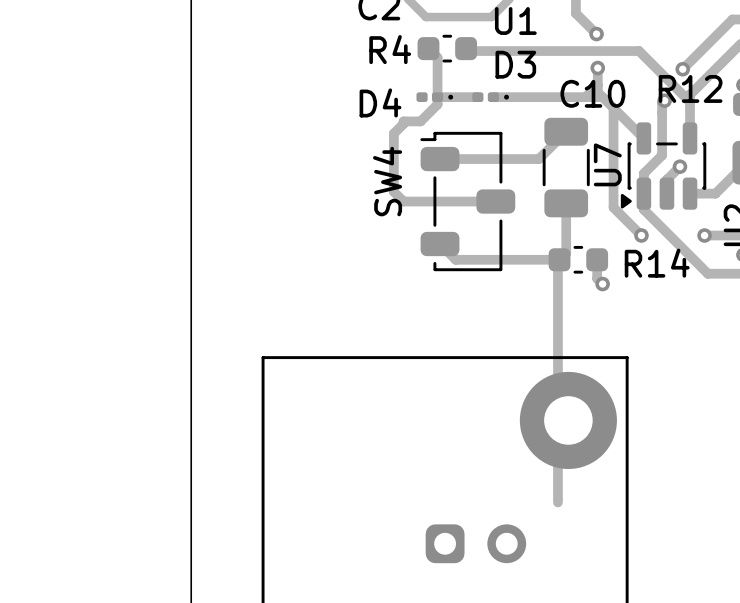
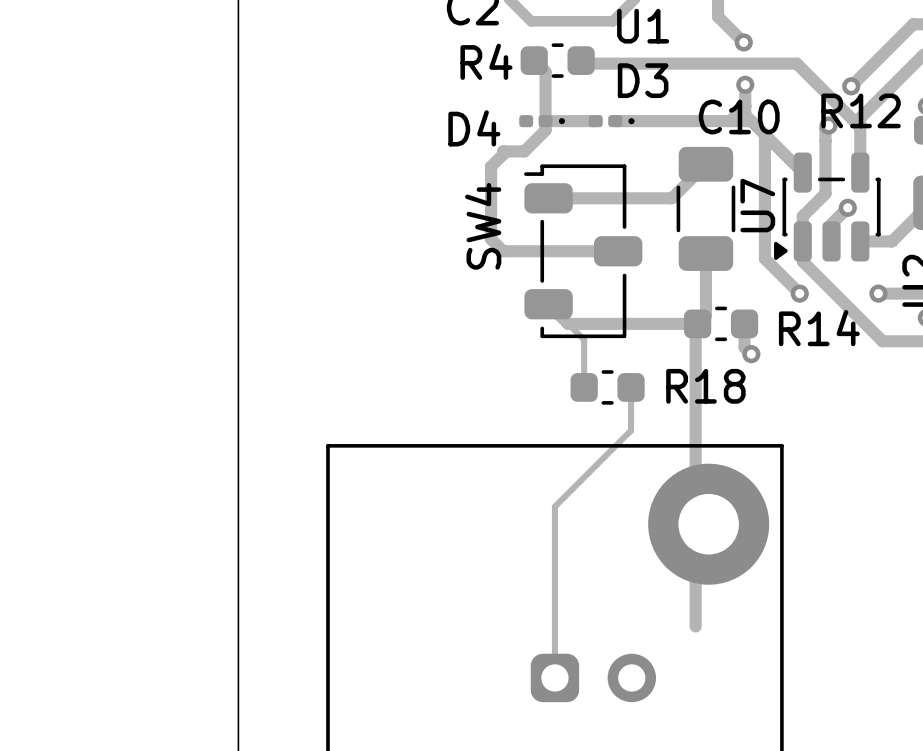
track: none -> (548, 304) (584, 339) (584, 387)
R18: none -> (607, 387)
track: none -> (631, 387) (631, 430) (554, 506) (554, 677)

